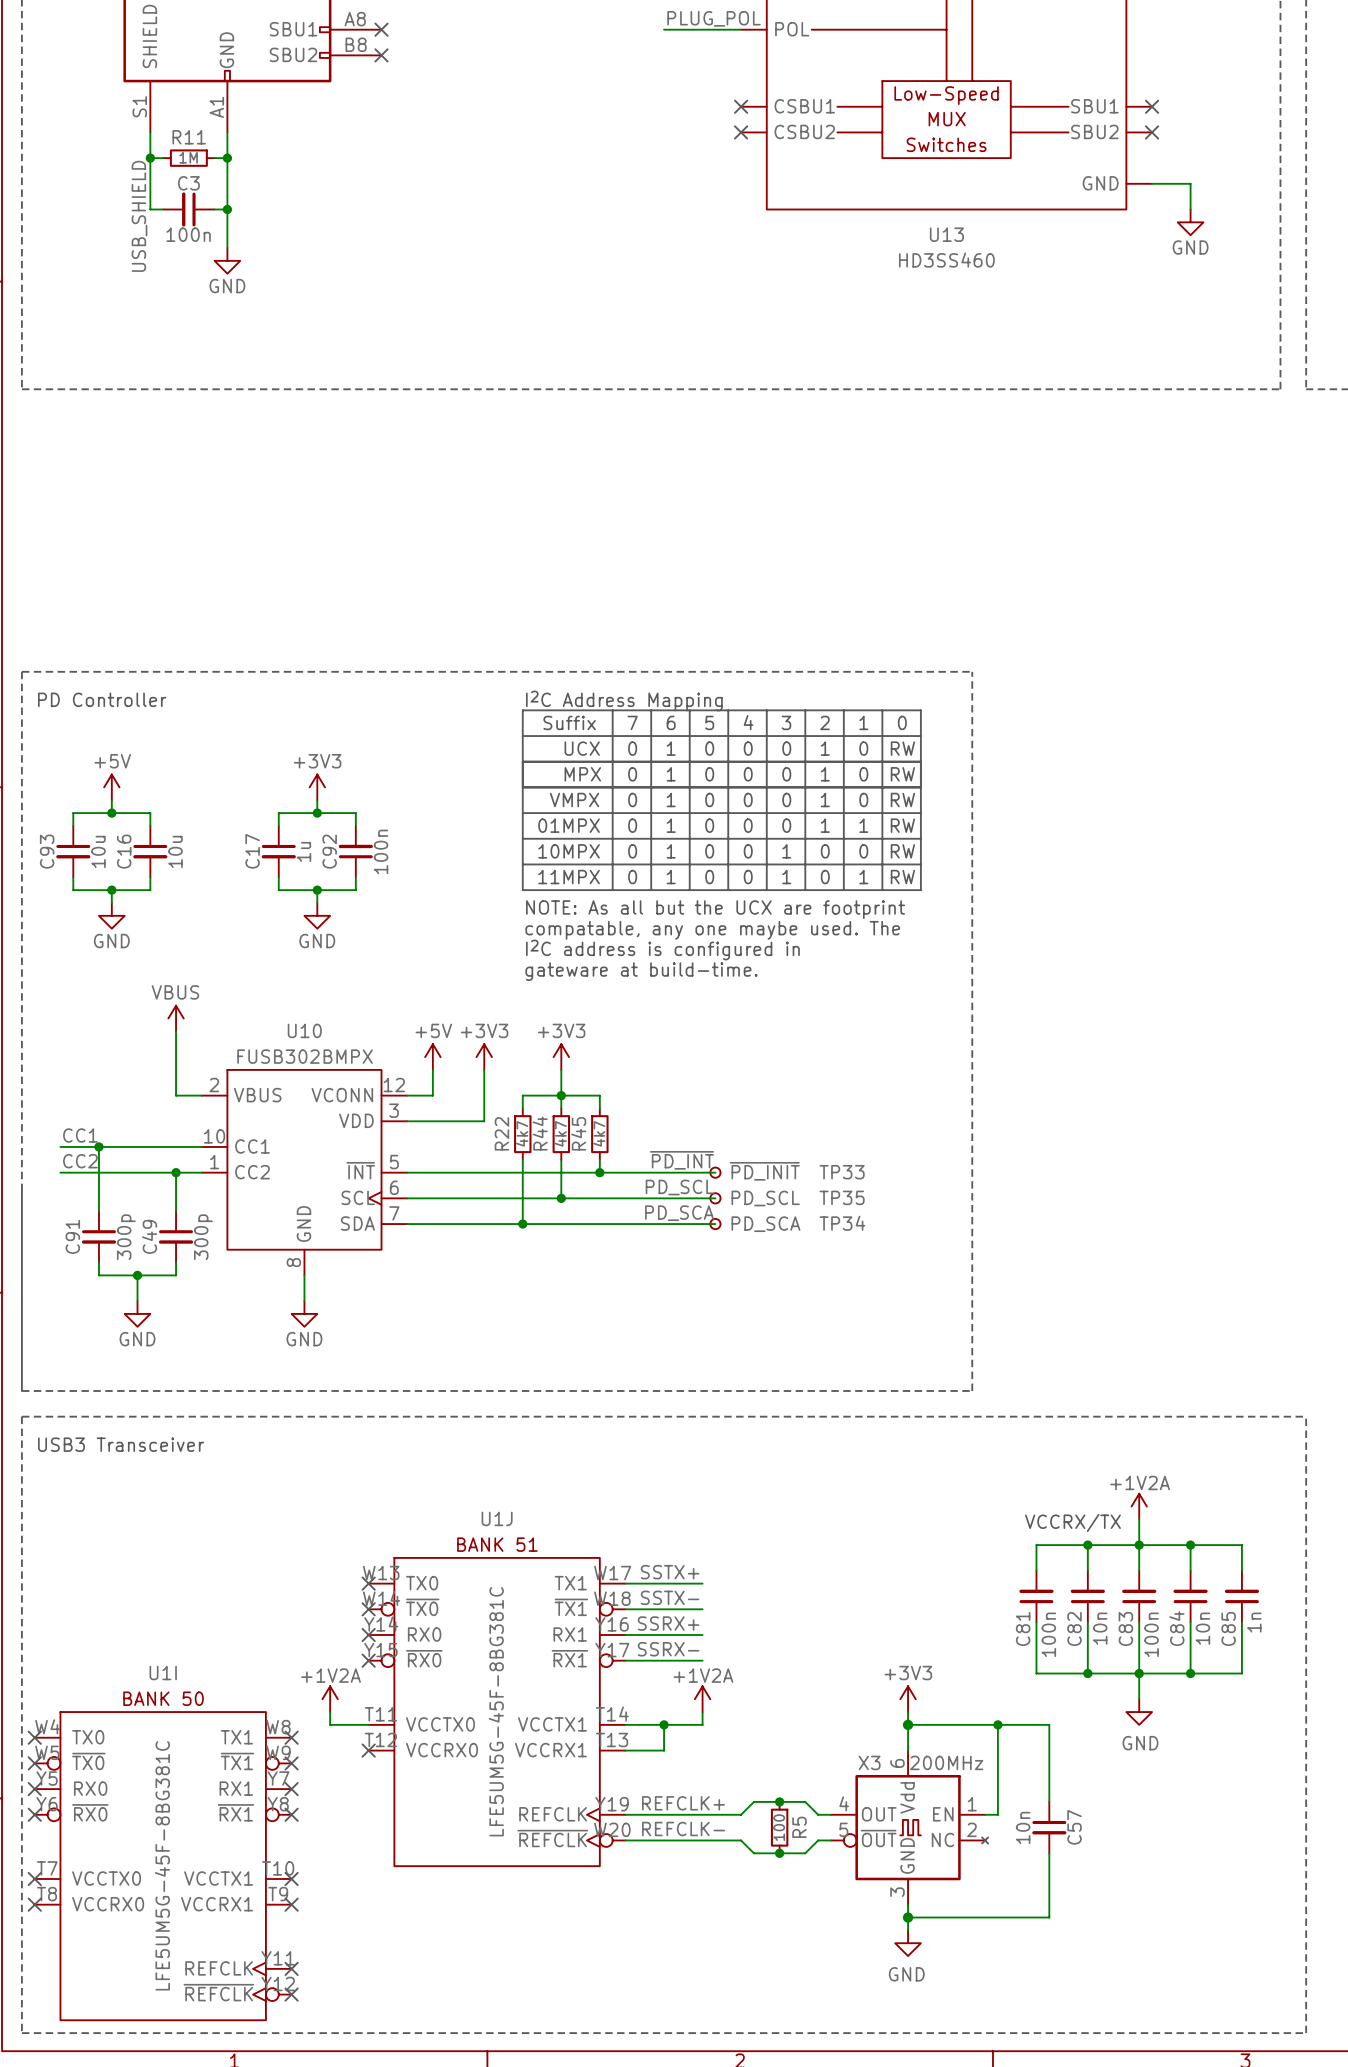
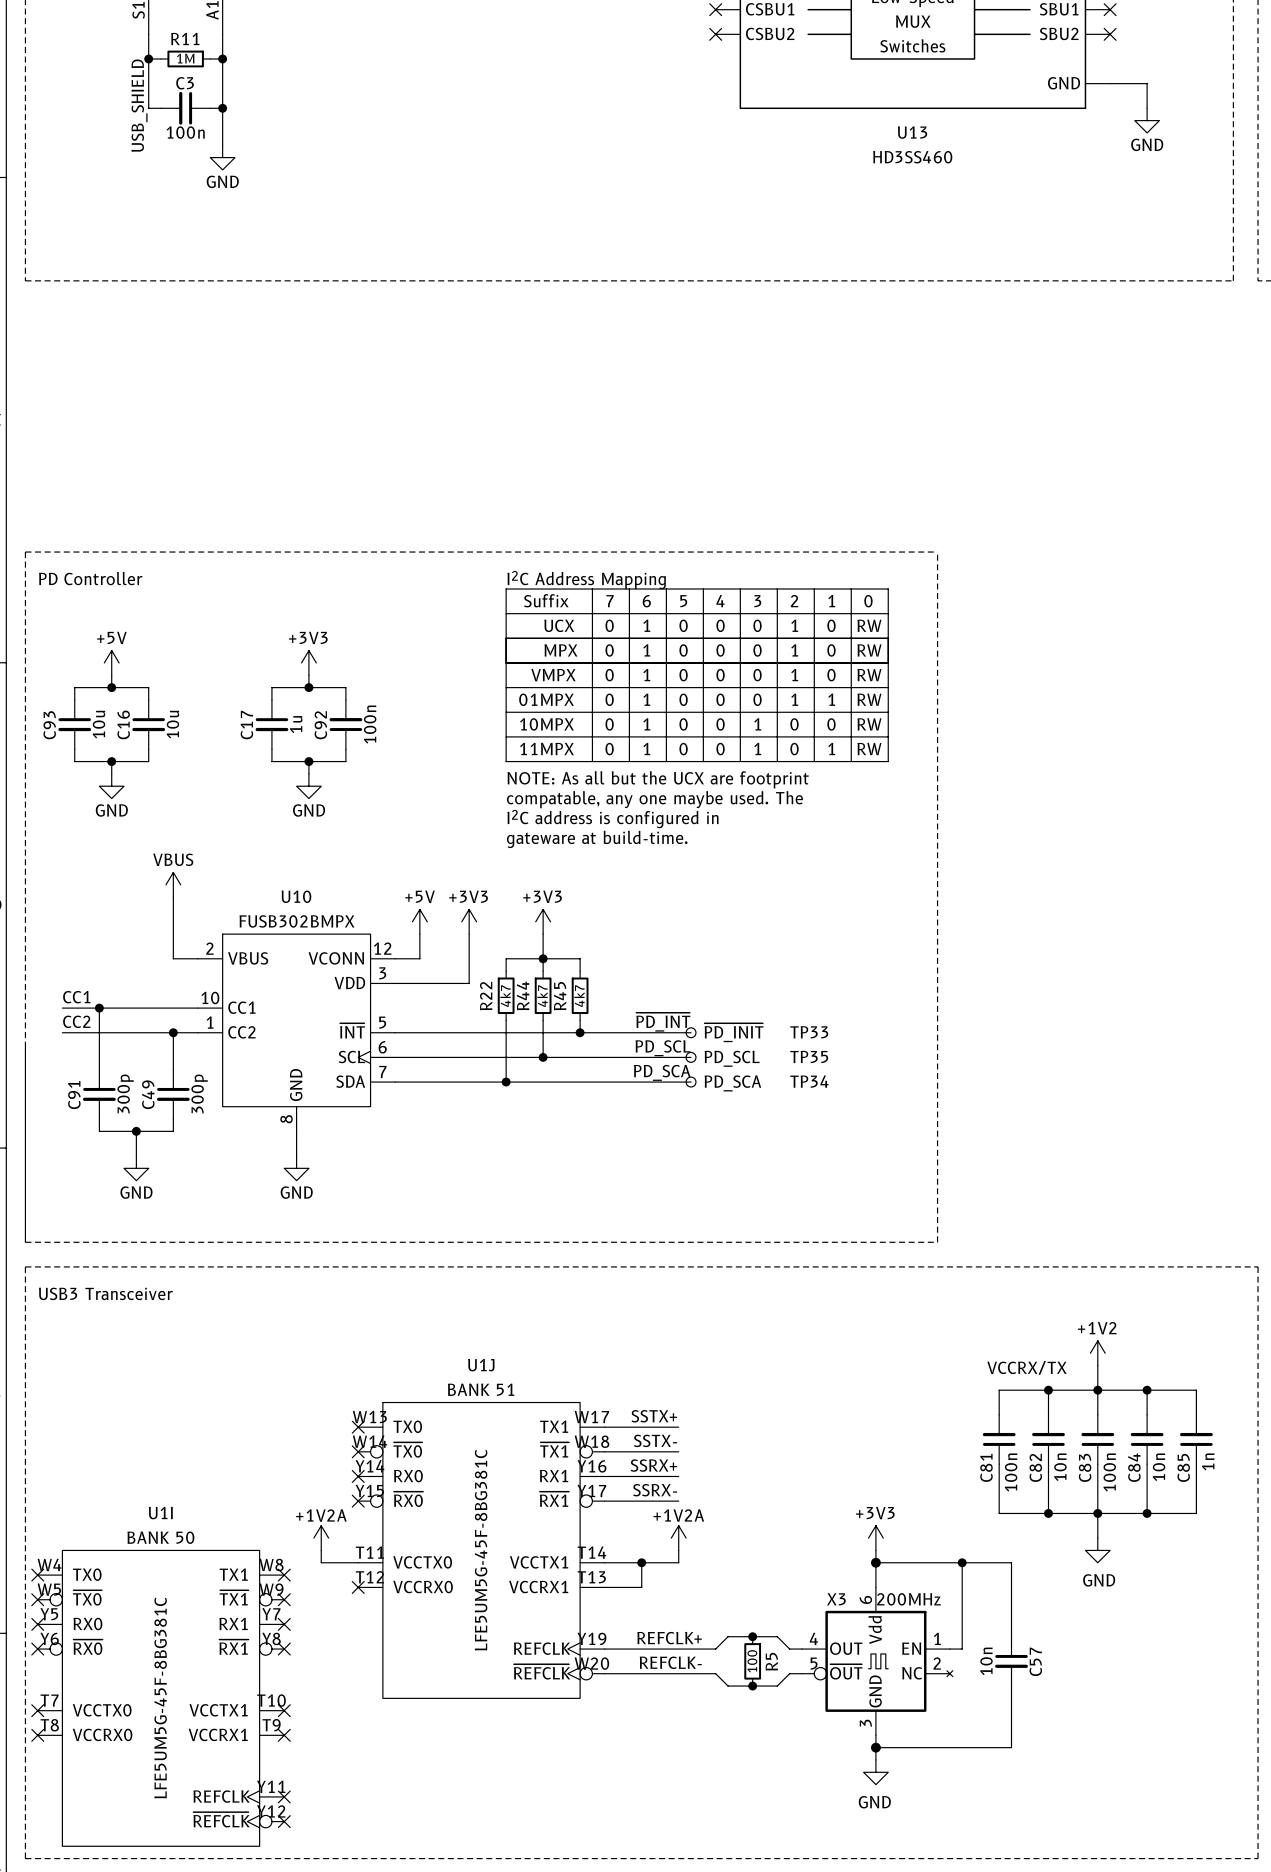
power symbol: +1V2A (1139, 1506) -> +1V2 (1097, 1353)

